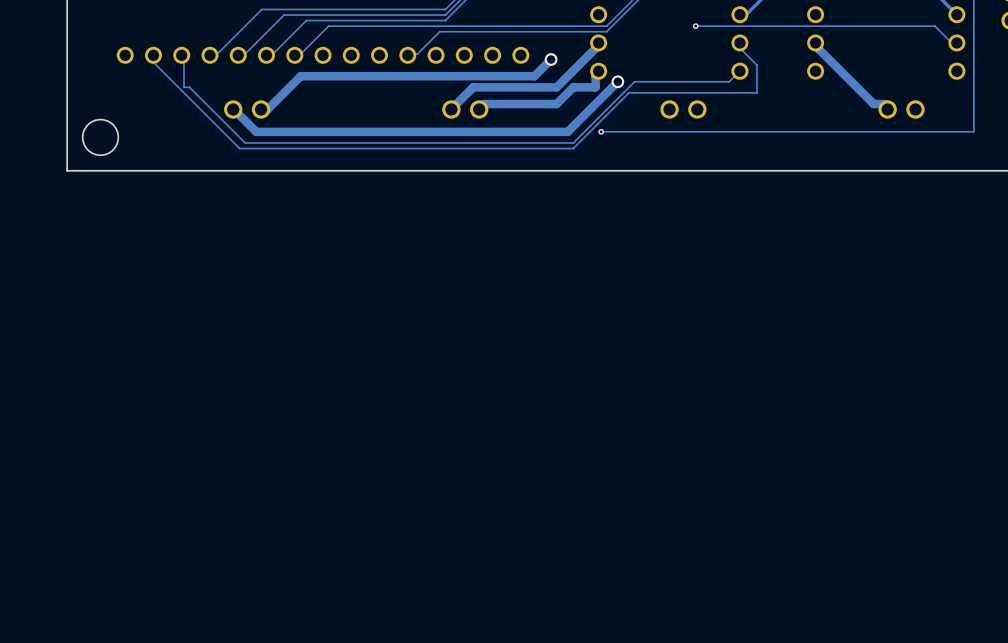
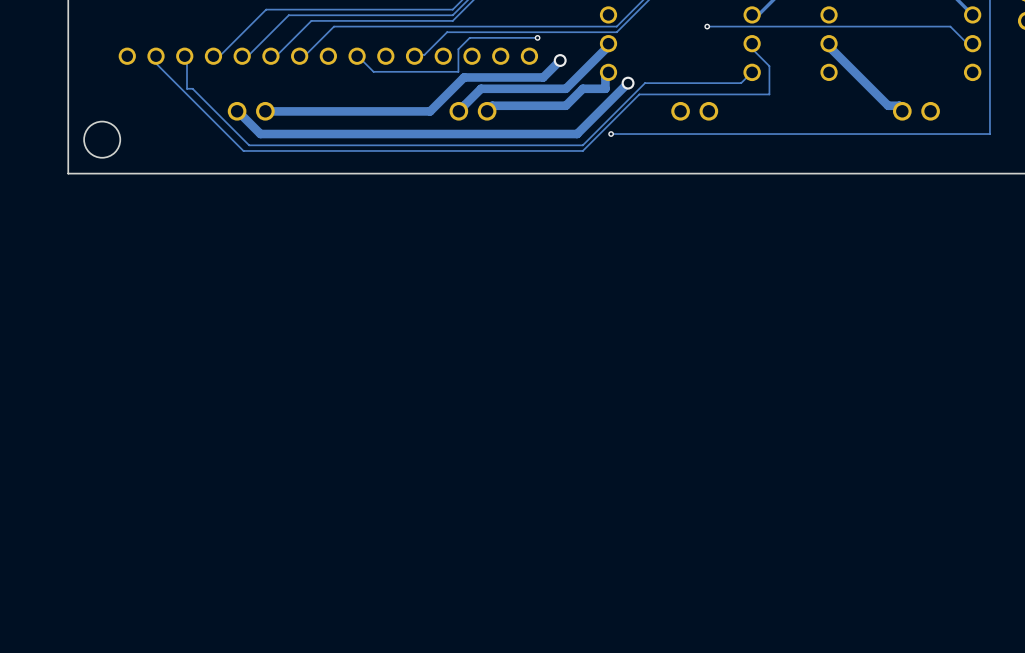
track: none -> (537, 37) (469, 37) (458, 49) (458, 71) (373, 71) (357, 56)
via: none -> (537, 37)
track: (456, 76) (300, 76) (267, 109) -> (464, 77) (430, 111) (271, 111)

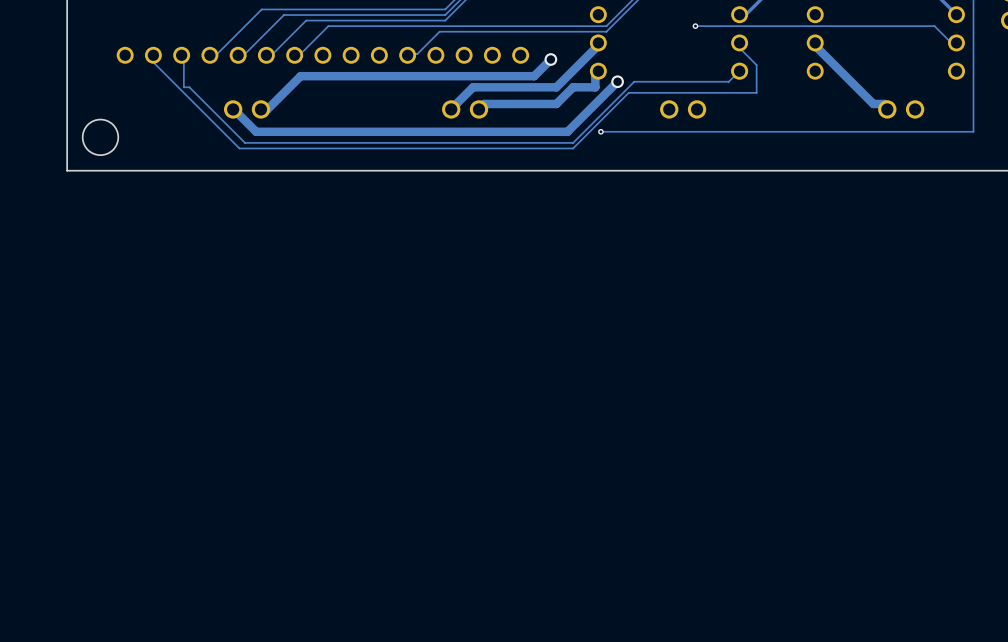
track: (537, 37) (469, 37) (458, 49) (458, 71) (373, 71) (357, 56) -> none
via: (537, 37) -> none
track: (464, 77) (430, 111) (271, 111) -> (456, 76) (300, 76) (267, 109)

